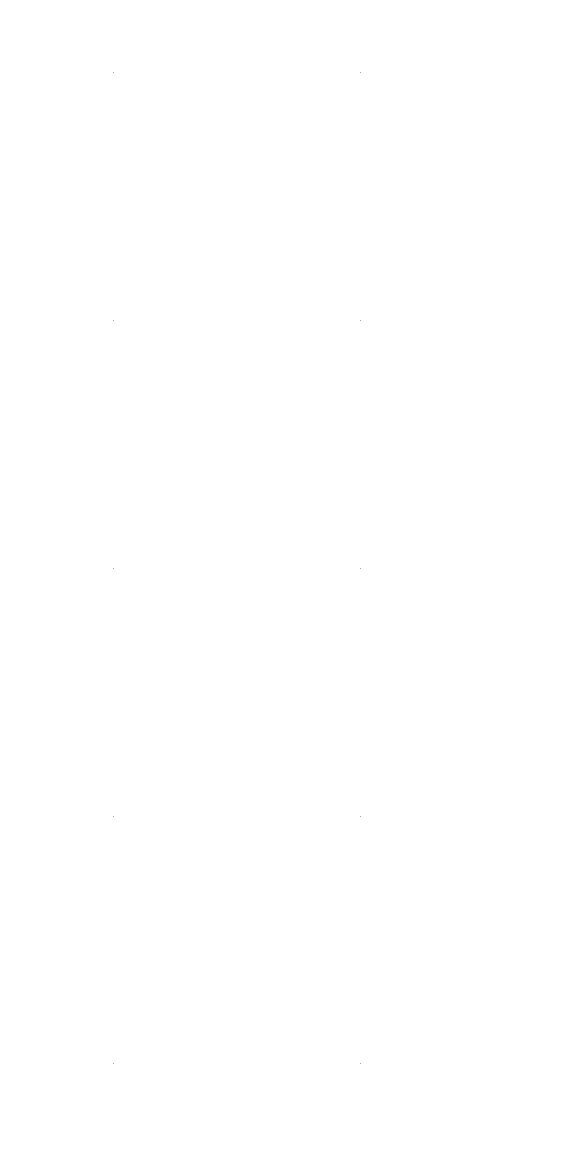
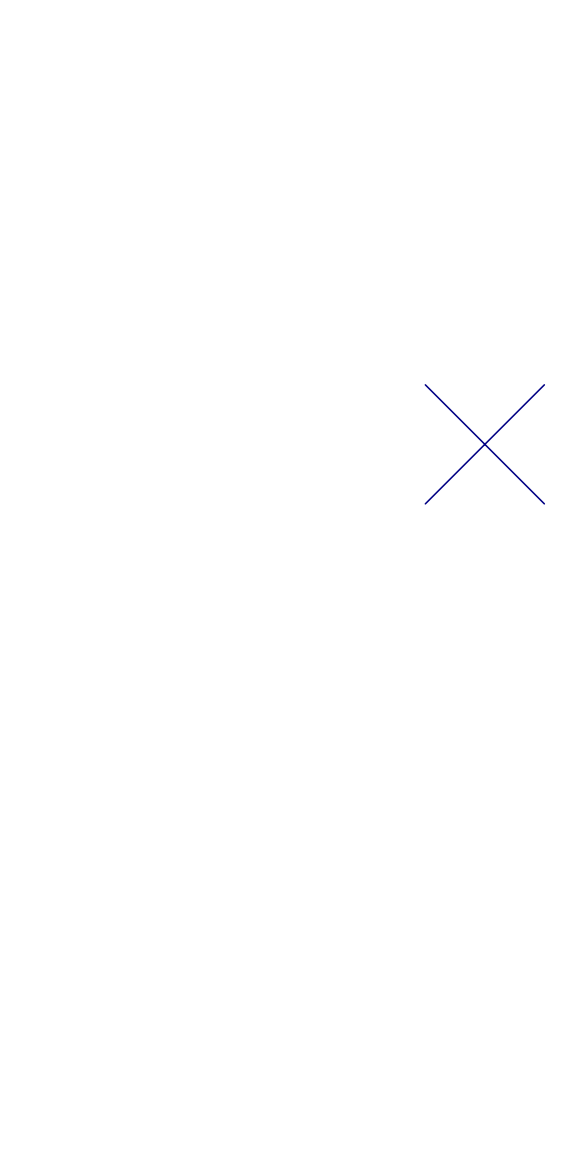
no-connect mark: none -> (484, 444)

